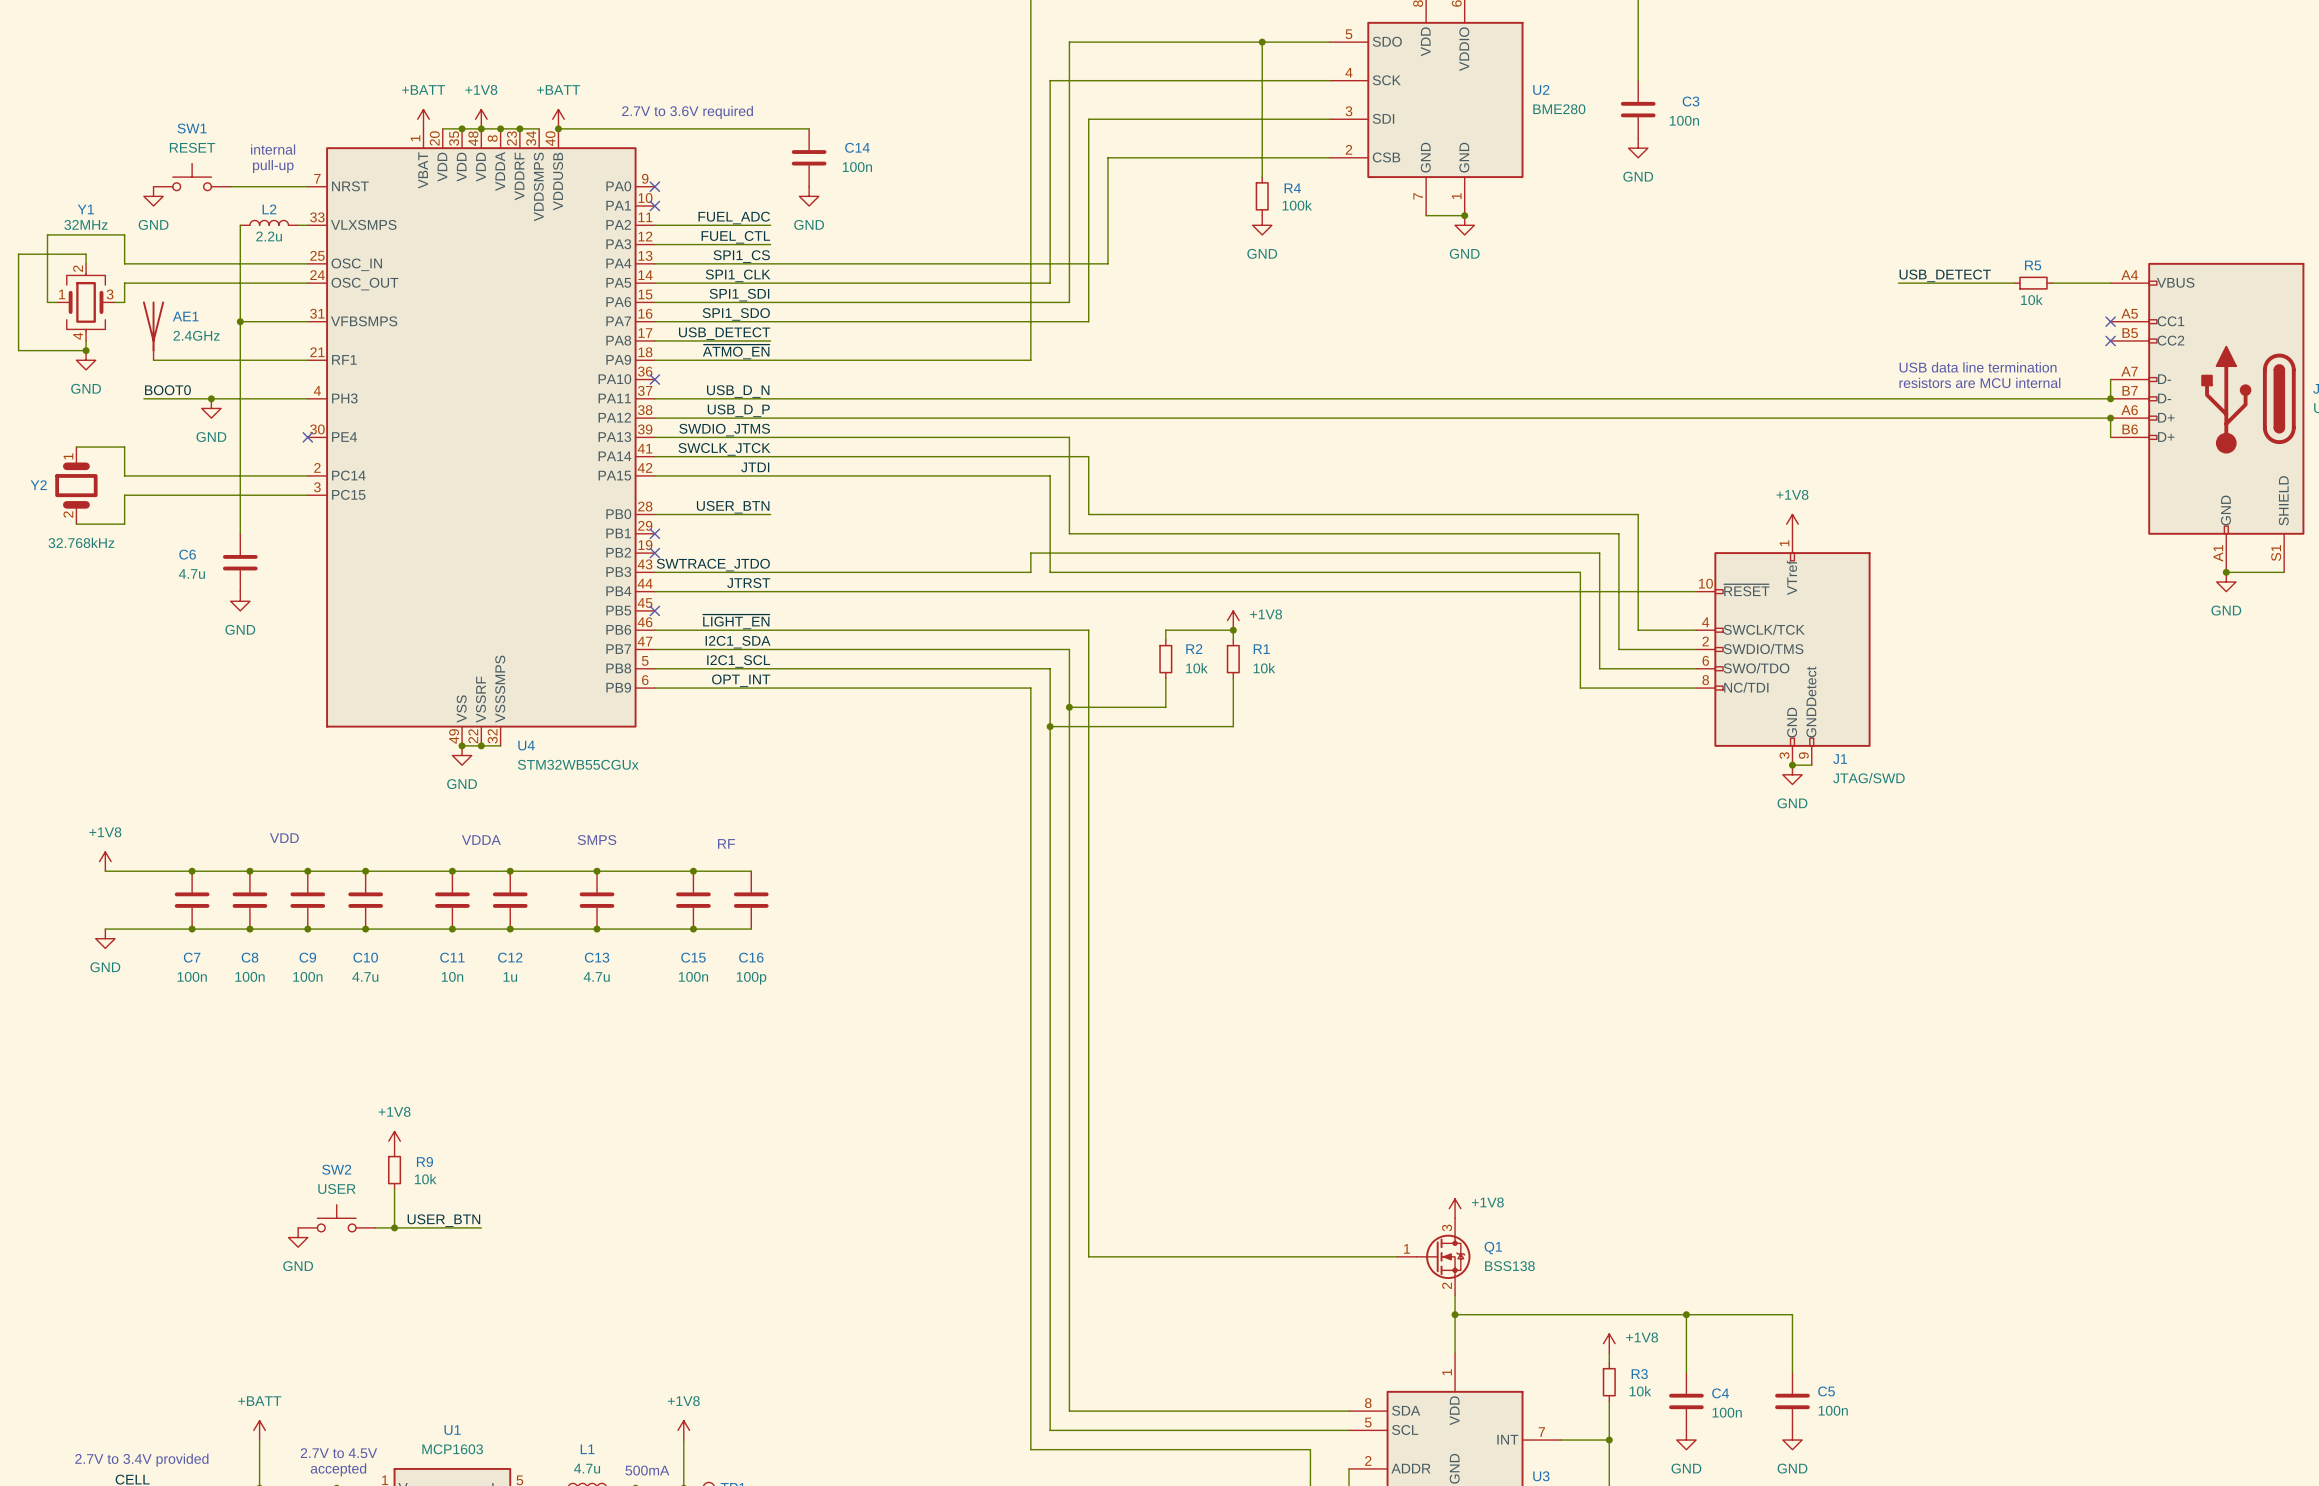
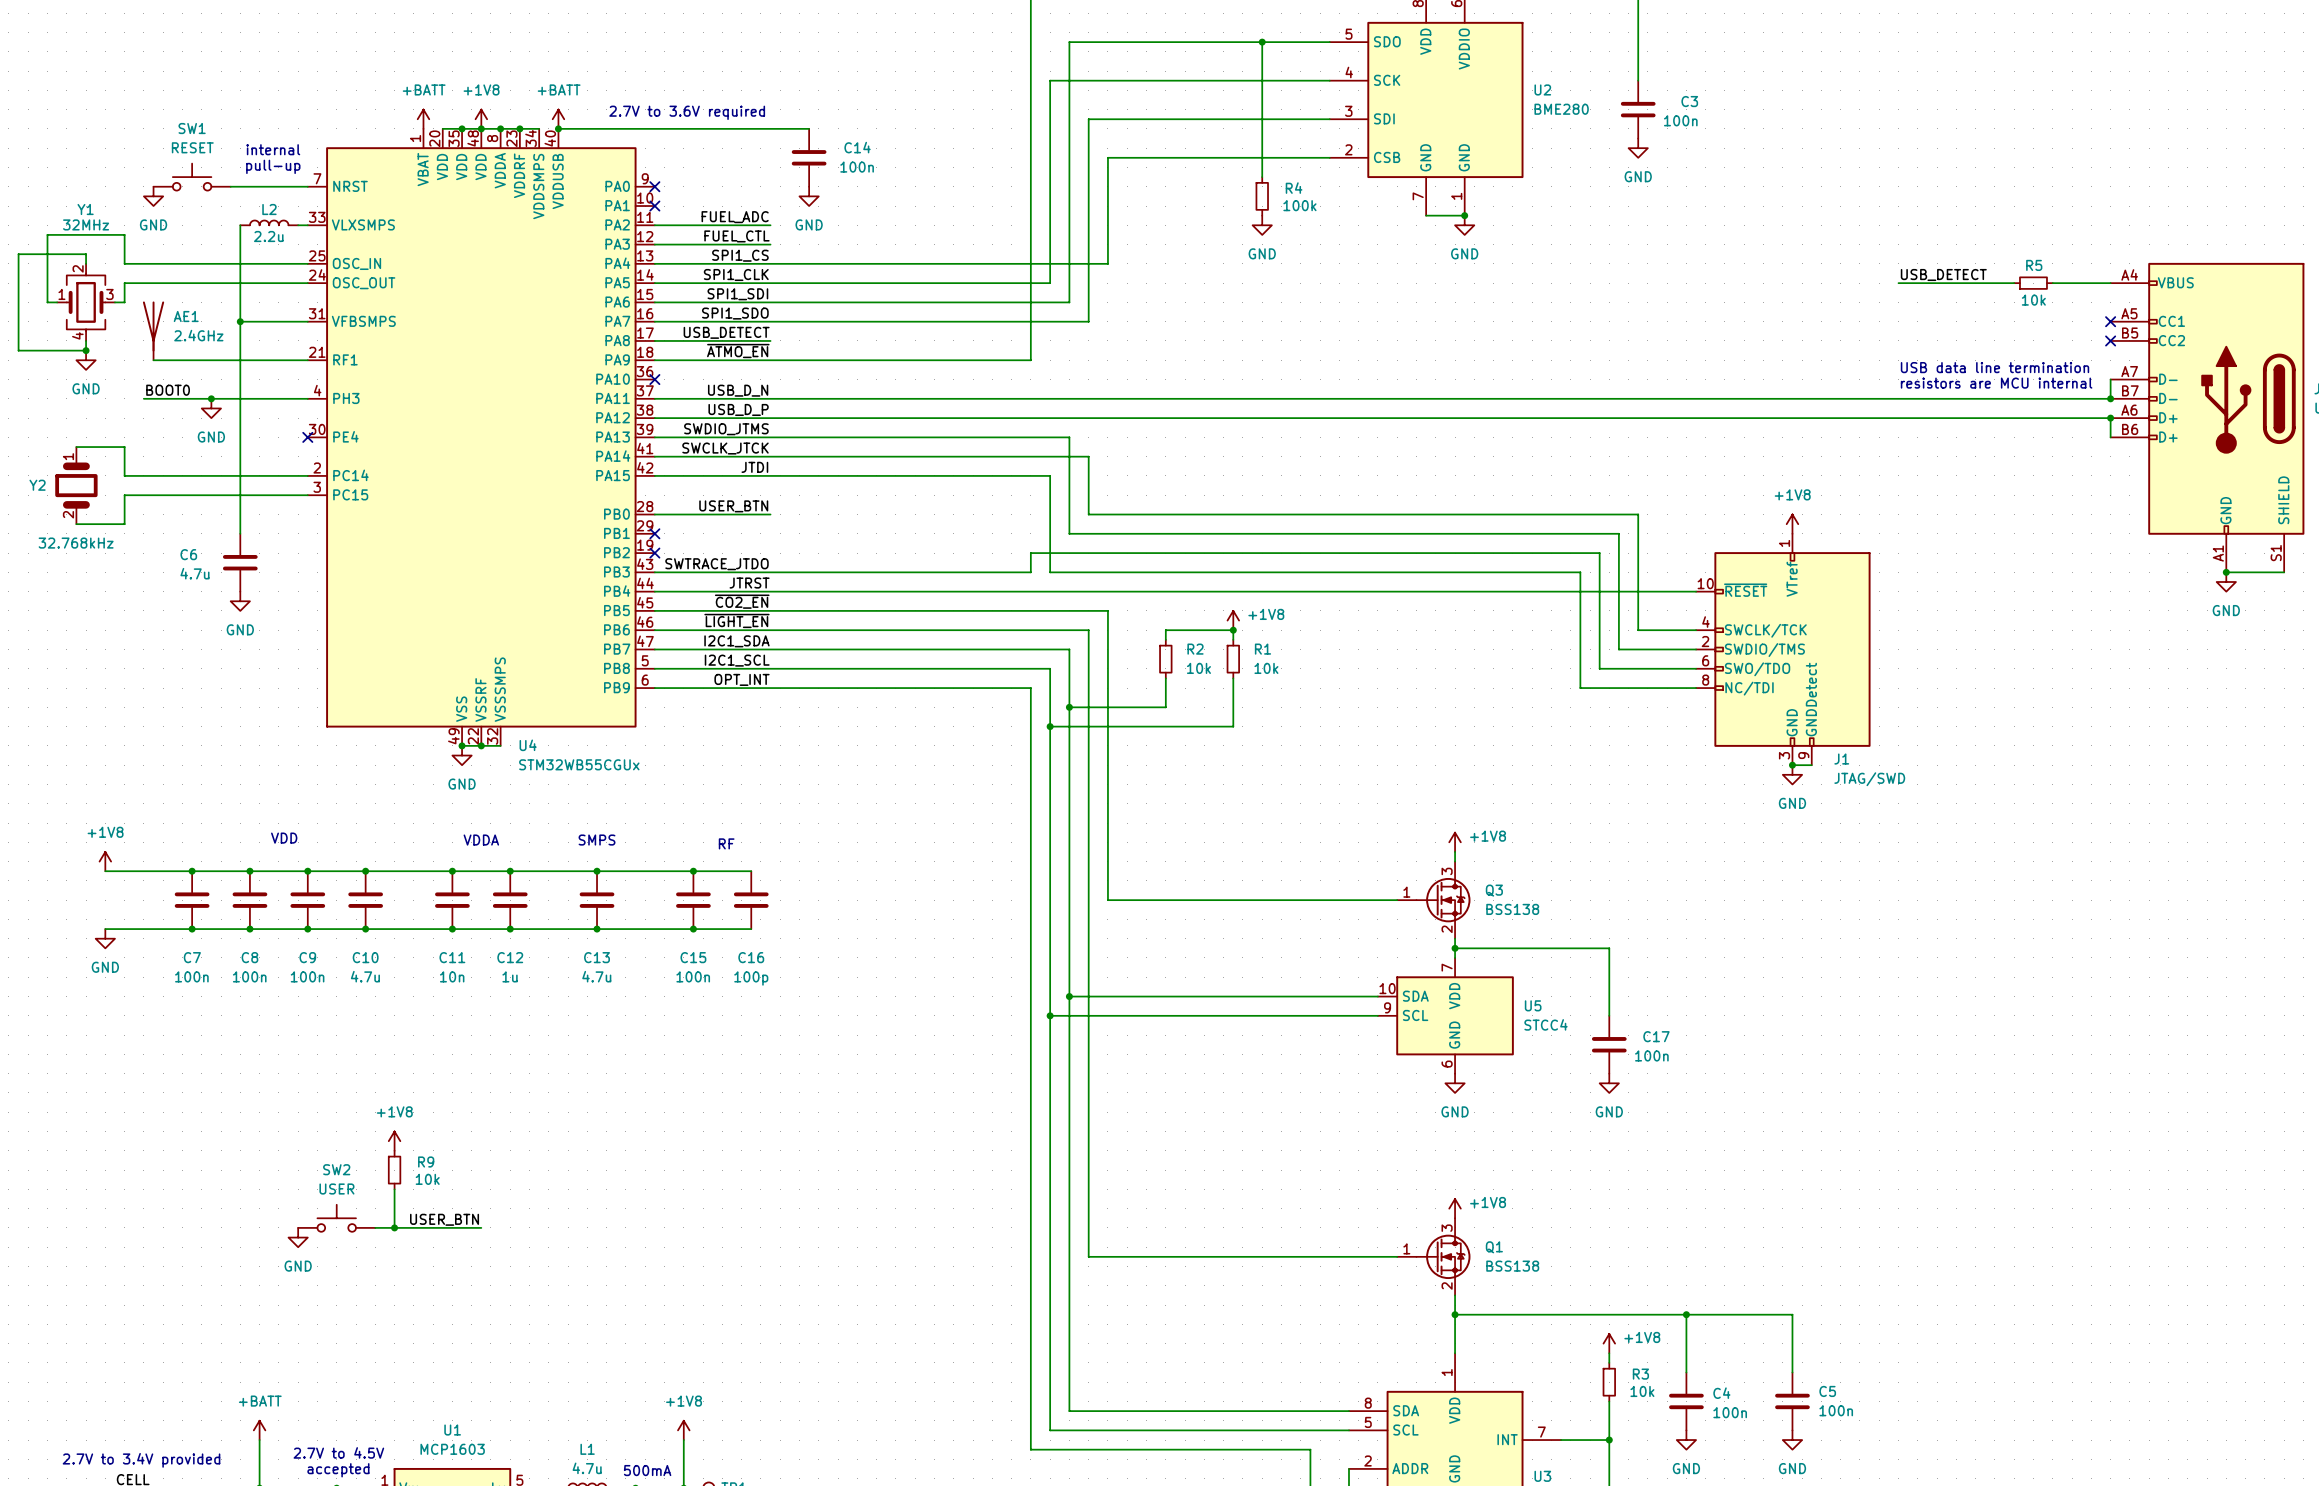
label: none -> ~{CO2_EN} (742, 601)
wire: none -> (654, 610) (1107, 610) (1107, 900) (1397, 900)
no-connect mark: (654, 610) -> none
power symbol: none -> +1V8 (1455, 842)
wire: none -> (1455, 851) (1455, 861)
Q3: none -> BSS138 (1433, 900)
wire: none -> (1455, 938) (1455, 957)
wire: none -> (1455, 948) (1609, 948) (1609, 1015)
junction: none -> (1455, 948)
wire: none -> (1069, 996) (1377, 996)
junction: none -> (1069, 996)
wire: none -> (1050, 1015) (1377, 1015)
junction: none -> (1050, 1015)
U5: none -> STCC4 (1445, 1015)
C17: none -> 100n (1609, 1044)
power symbol: none -> GND (1455, 1083)
power symbol: none -> GND (1609, 1083)

